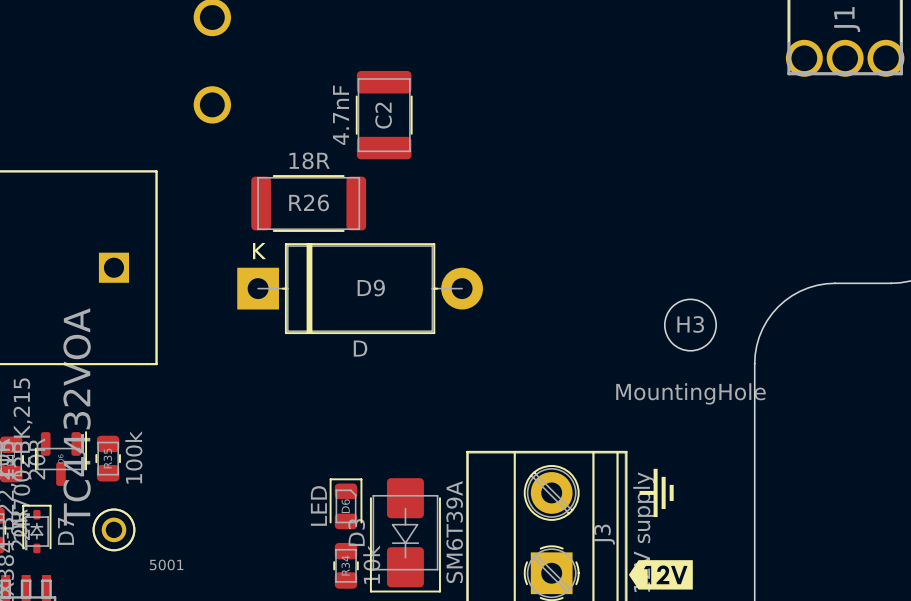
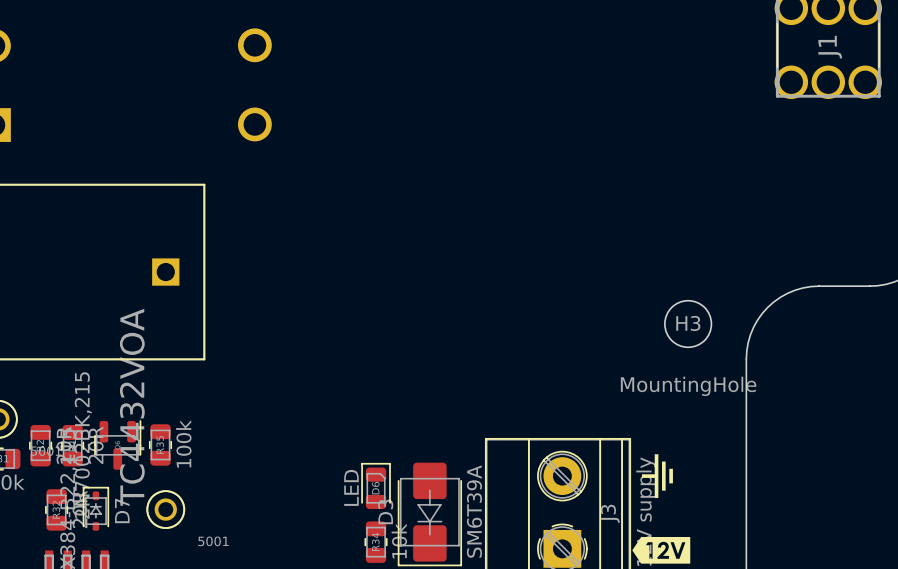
C2: 4.7nF (384, 115) -> none
R26: 18R (308, 203) -> none
D9: D (360, 288) -> none

